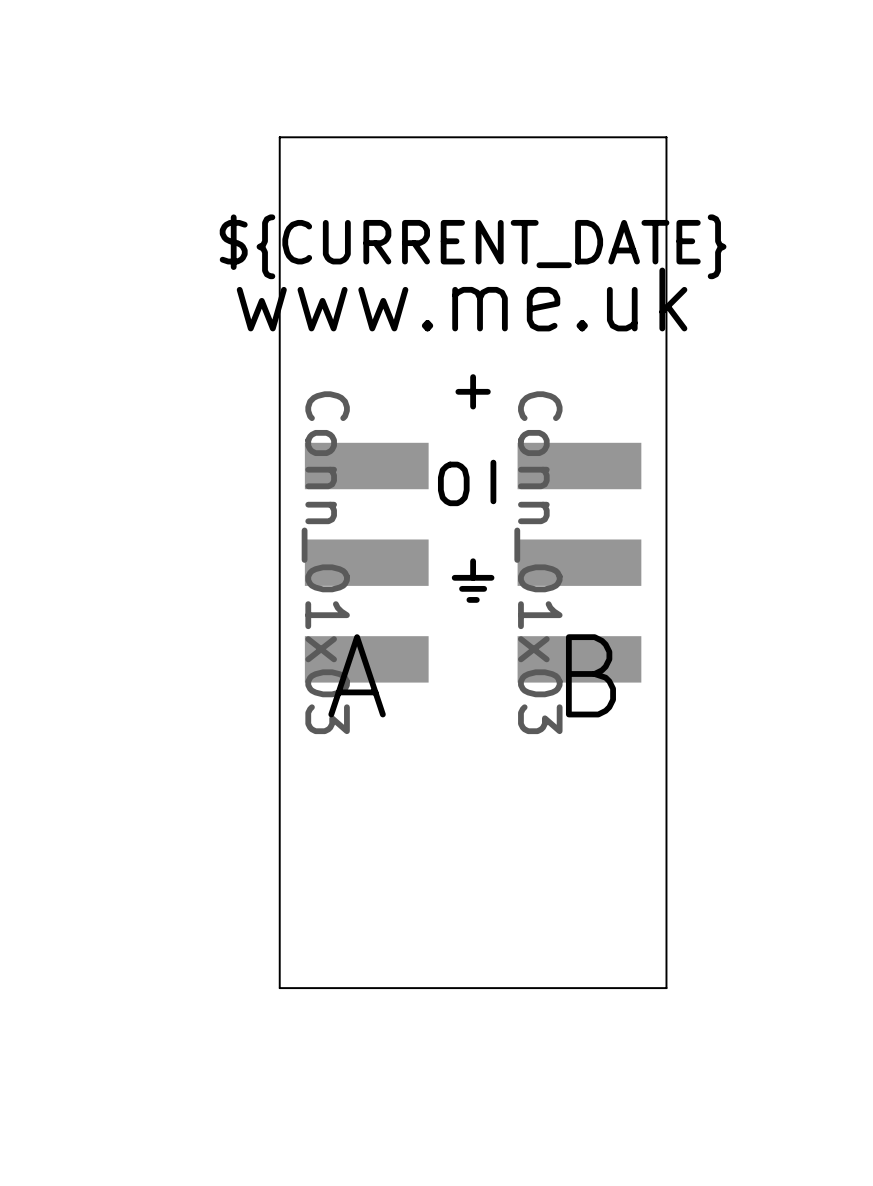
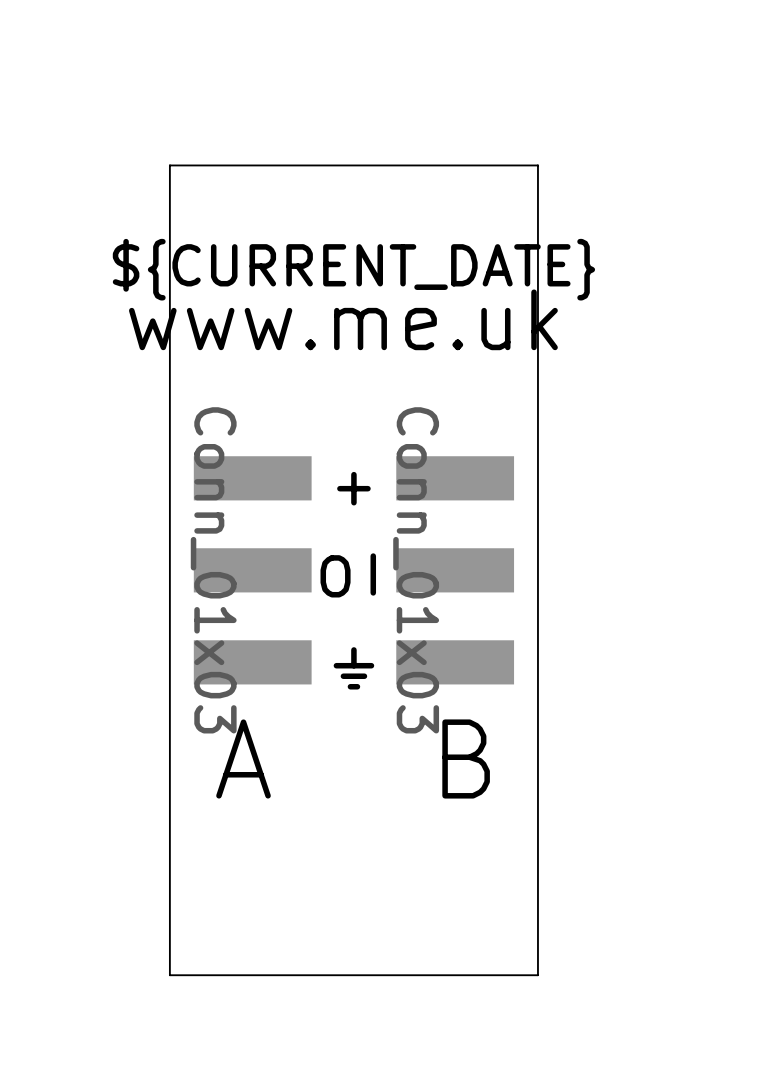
text position: + (473, 391) -> + (353, 488)
text position: I (493, 481) -> I (373, 574)
text position: O (453, 483) -> O (335, 576)
text position: ⏚ (473, 580) -> ⏚ (353, 668)
text position: A (357, 675) -> A (243, 758)
text position: B (590, 675) -> B (466, 758)

